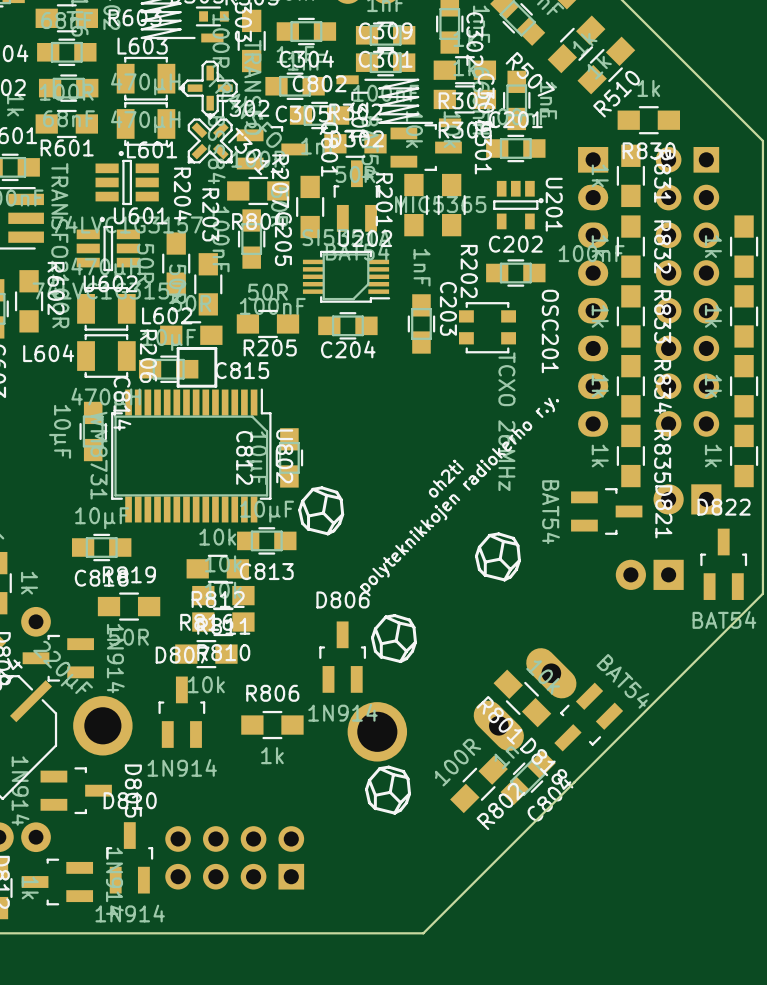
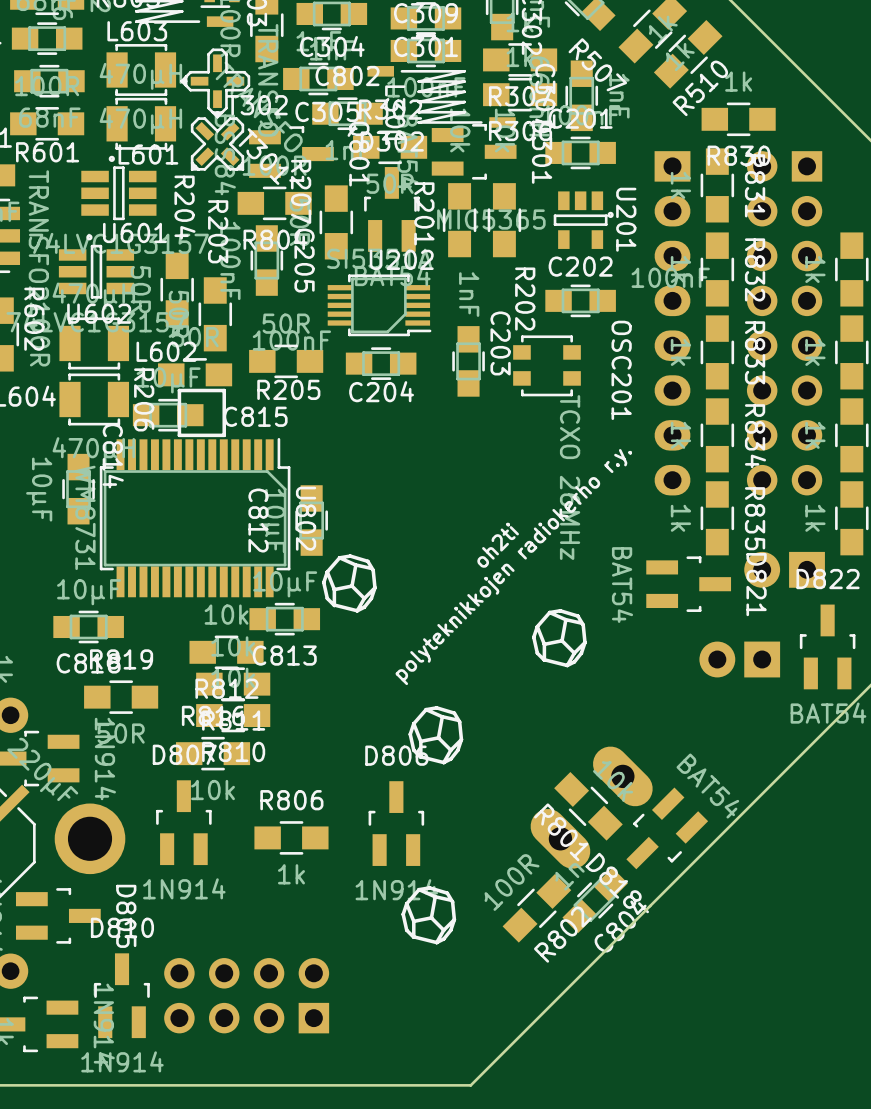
D806 position: (342, 657) -> (396, 823)
part: (377, 731) -> none

